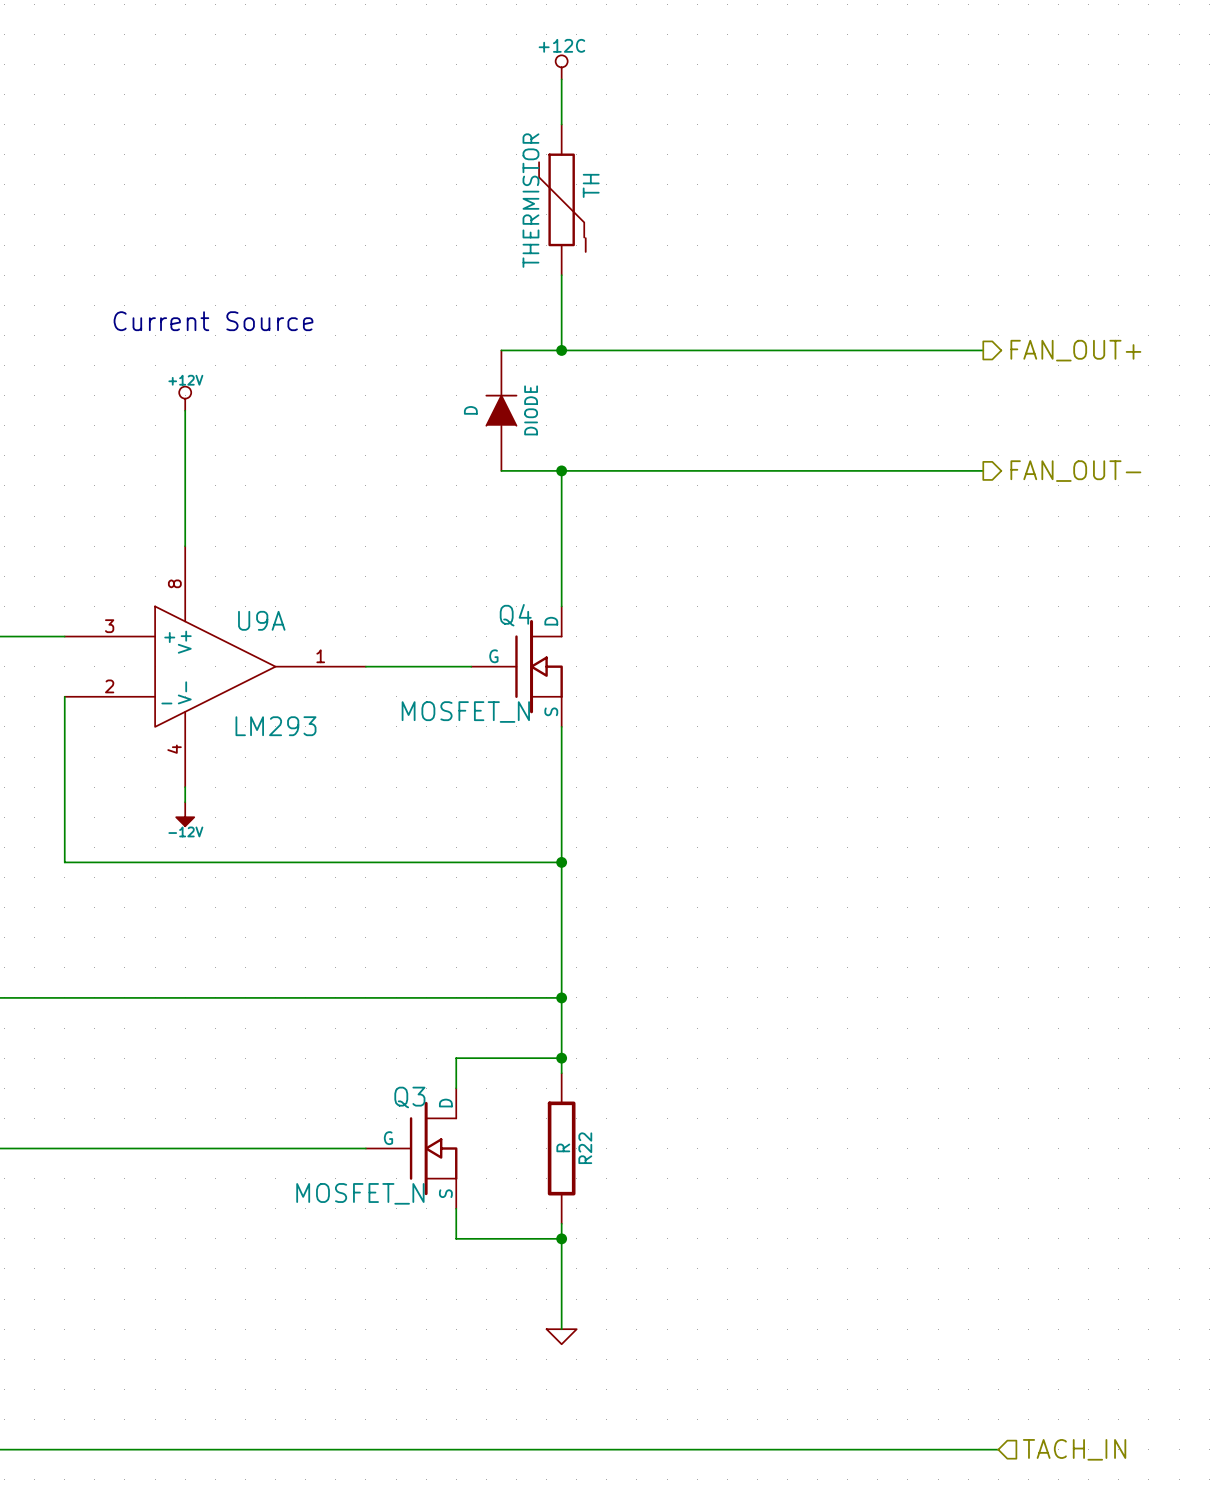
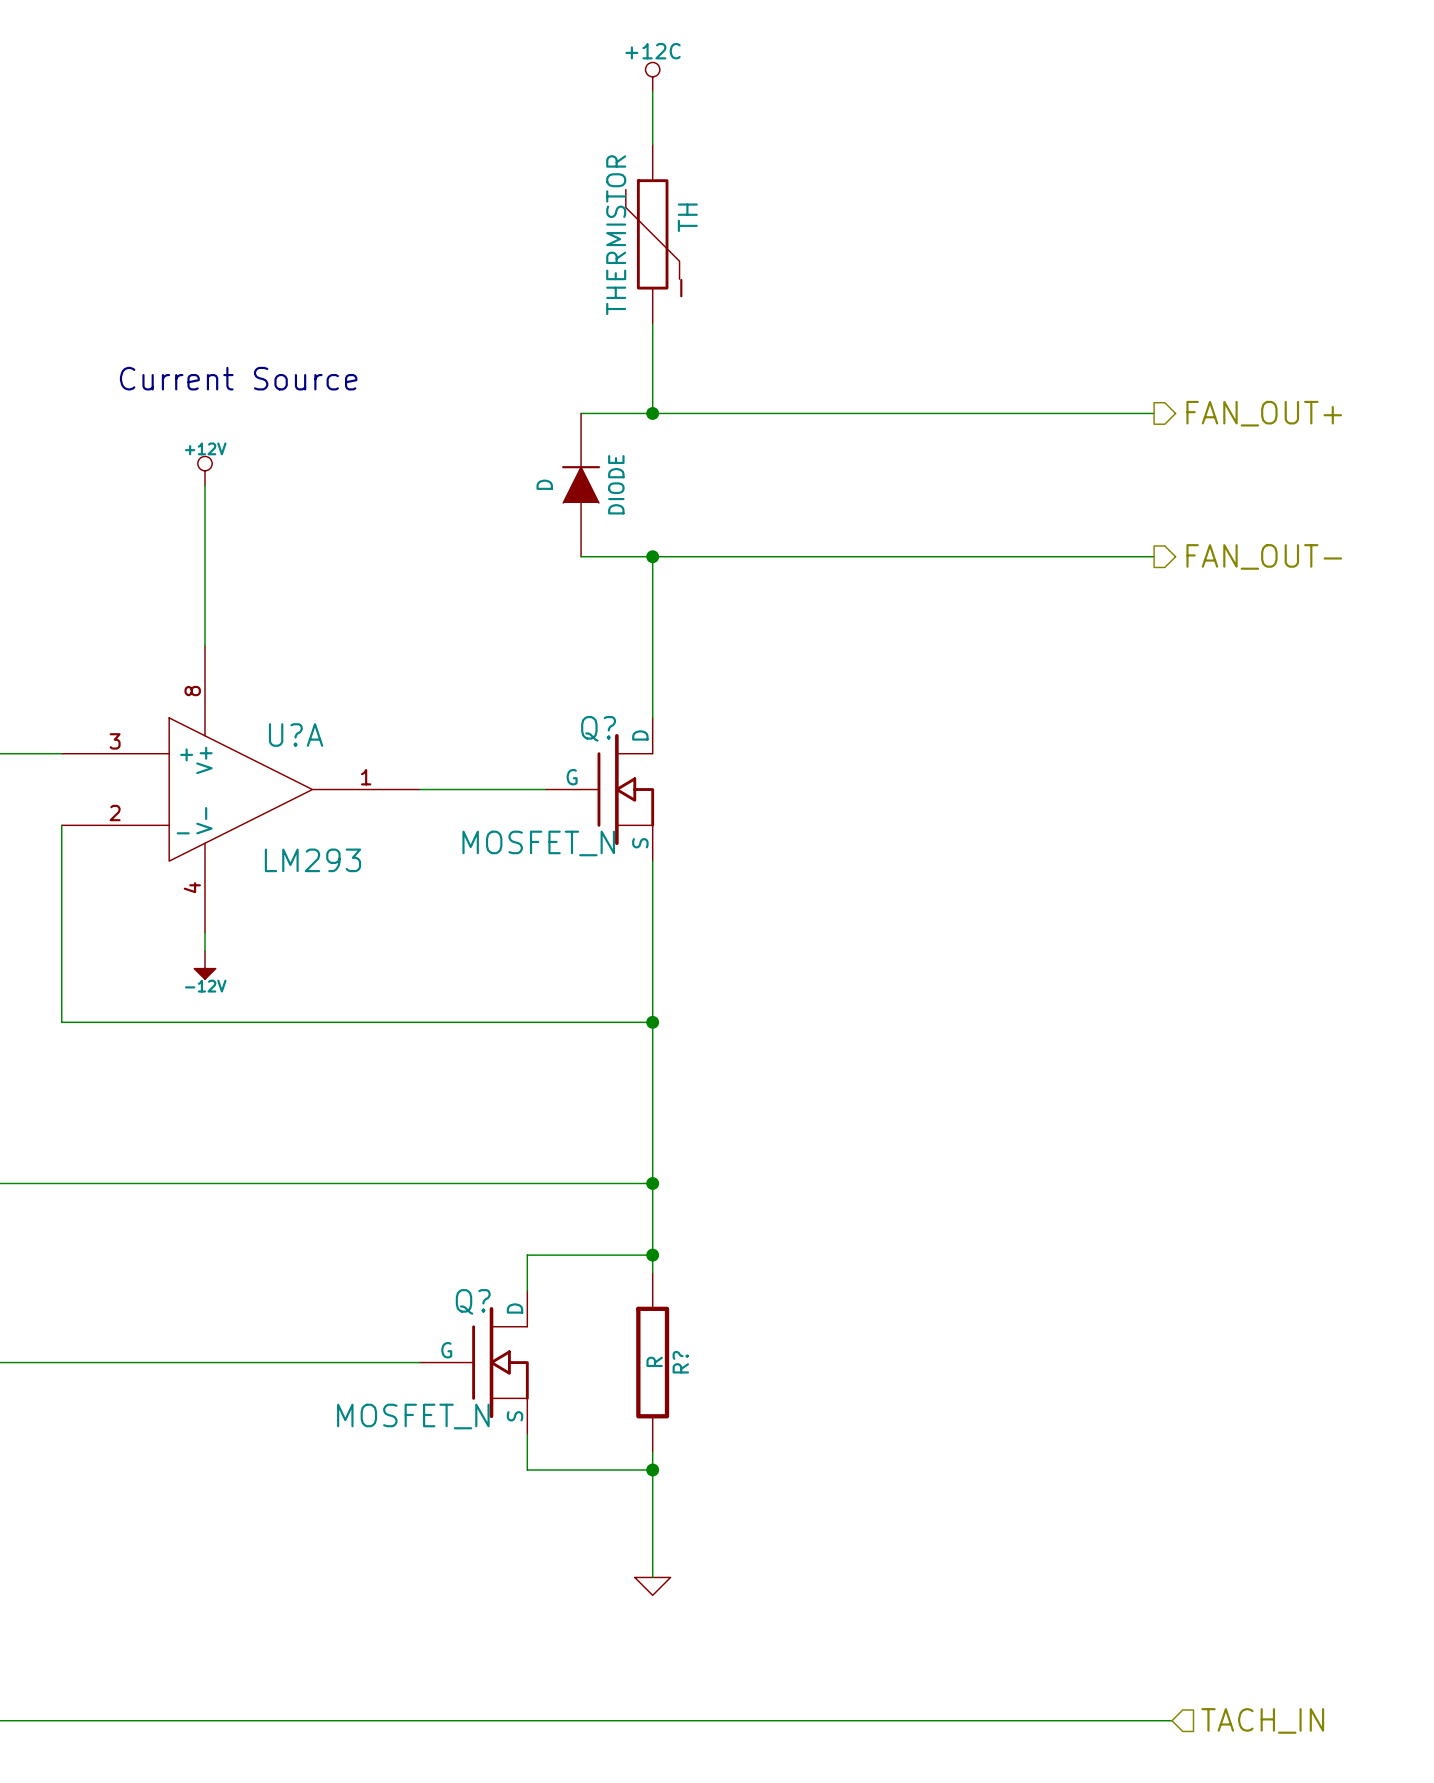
Q4 name: Q4 (515, 615) -> Q? (598, 728)
U9A name: U9A (261, 620) -> U?A (296, 735)
Q3 name: Q3 (409, 1097) -> Q? (473, 1301)
R22 name: R22 (585, 1148) -> R? (680, 1362)

